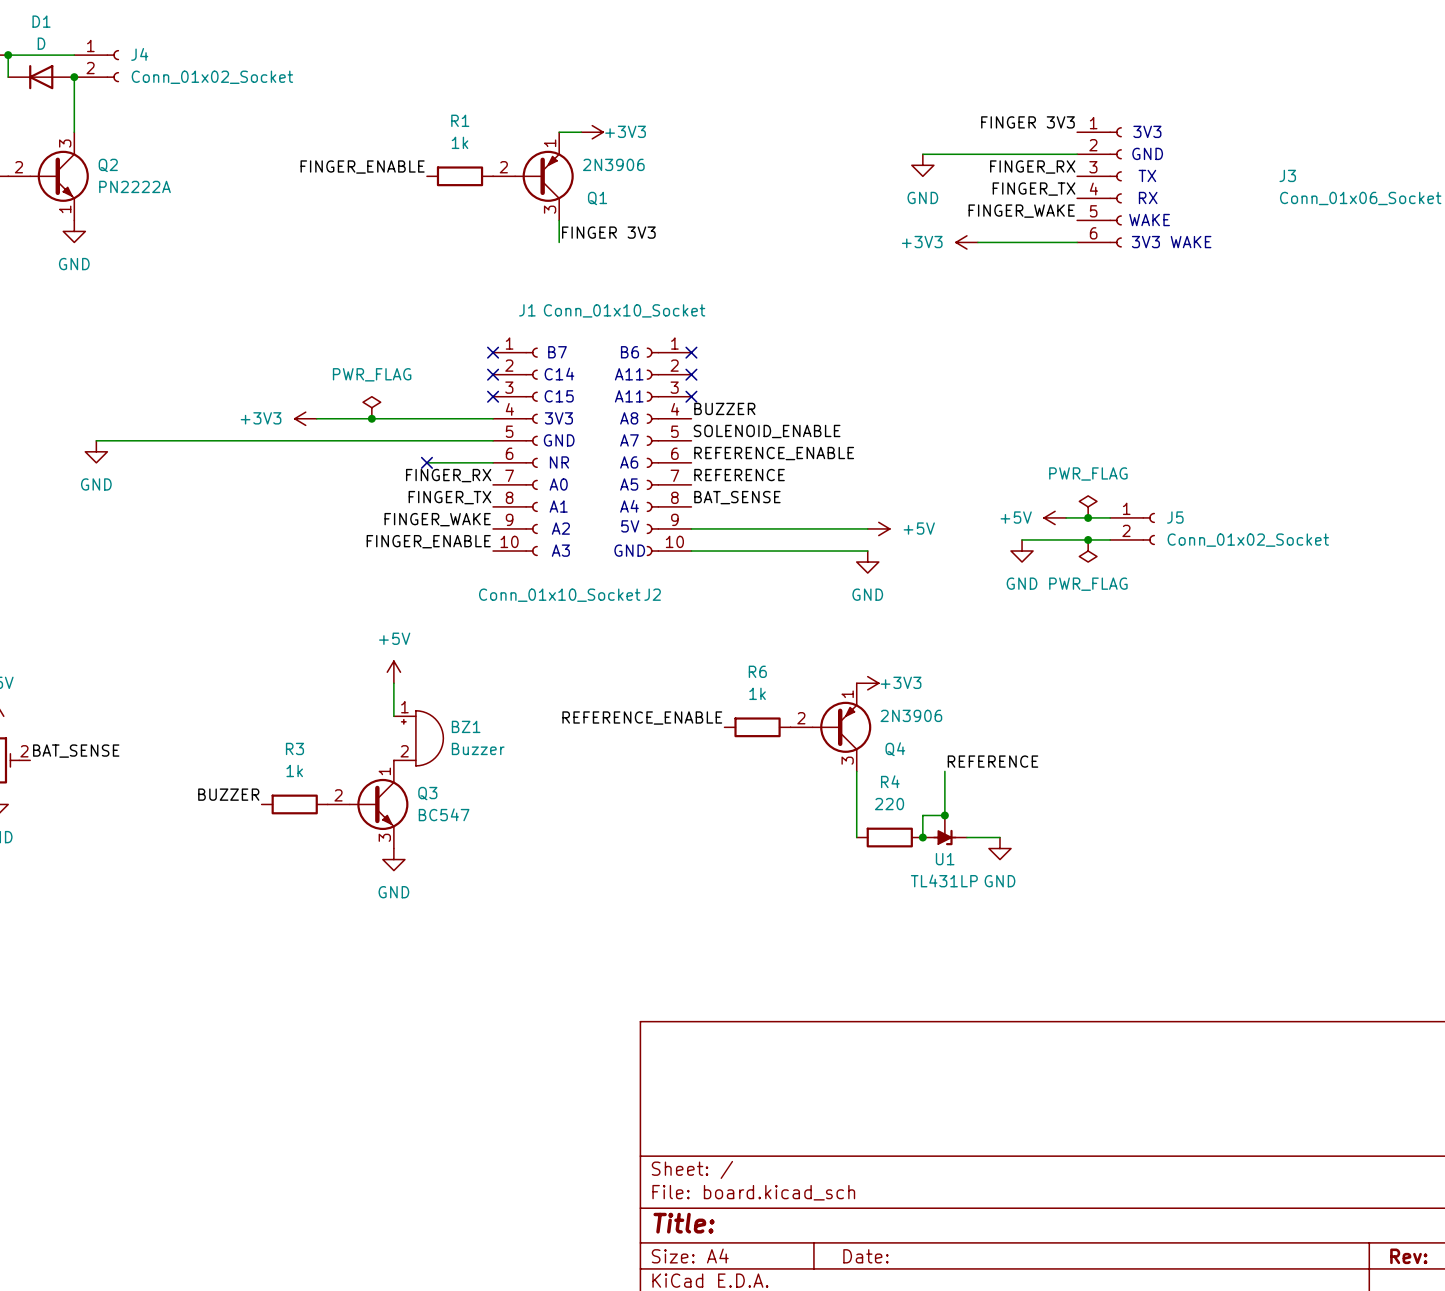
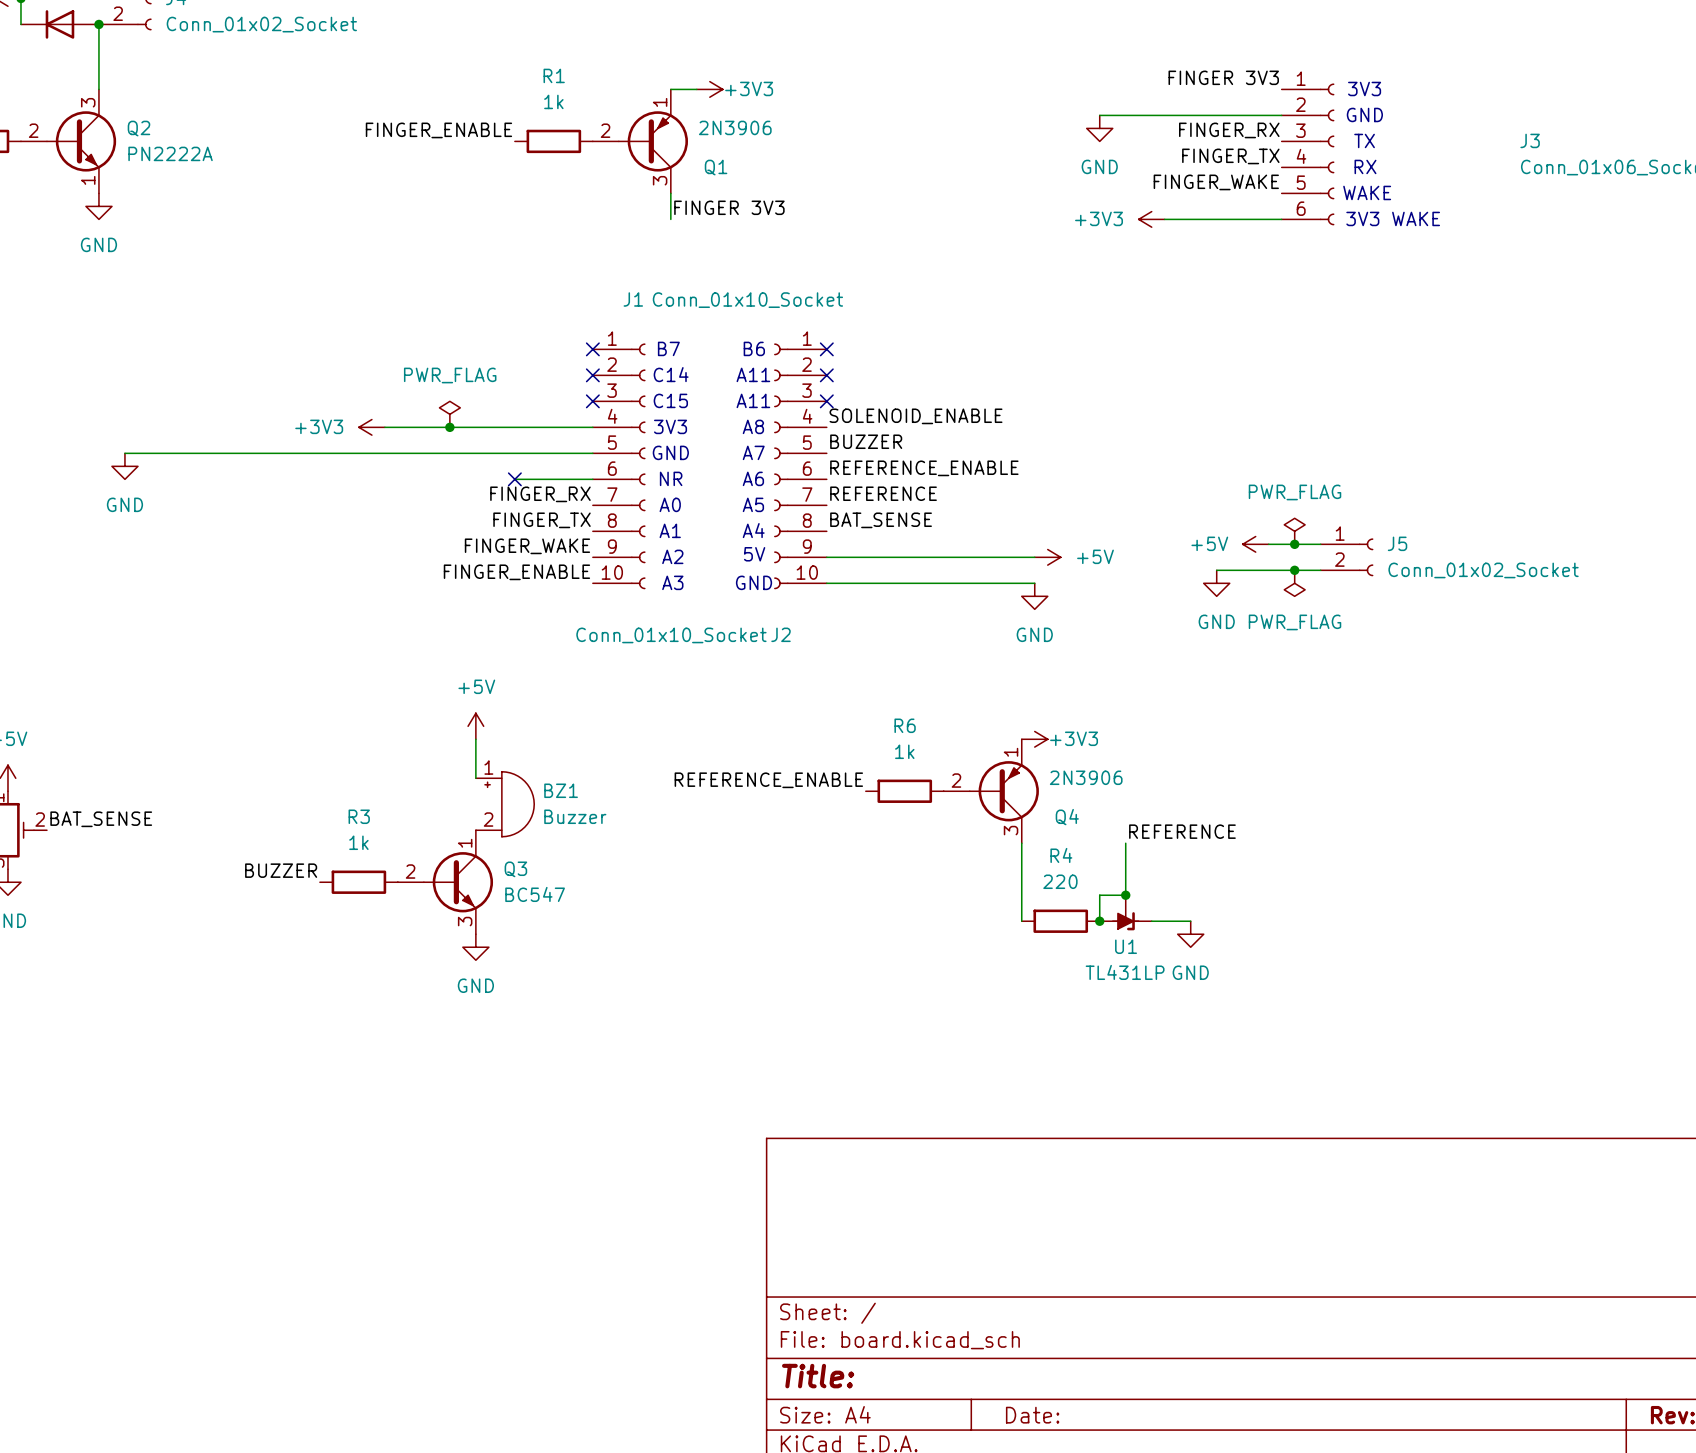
label: BUZZER (724, 408) -> SOLENOID_ENABLE (916, 416)
label: SOLENOID_ENABLE (767, 431) -> BUZZER (866, 441)

